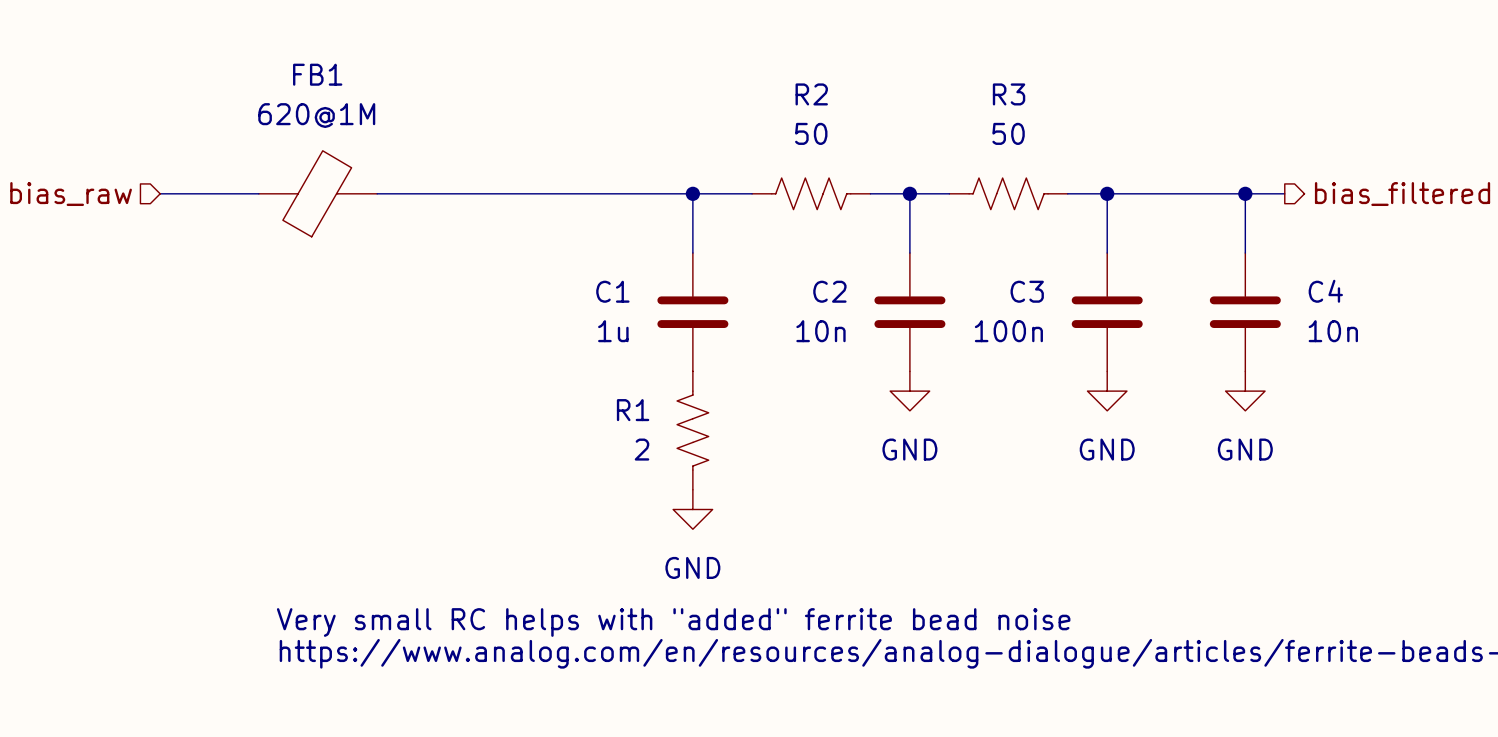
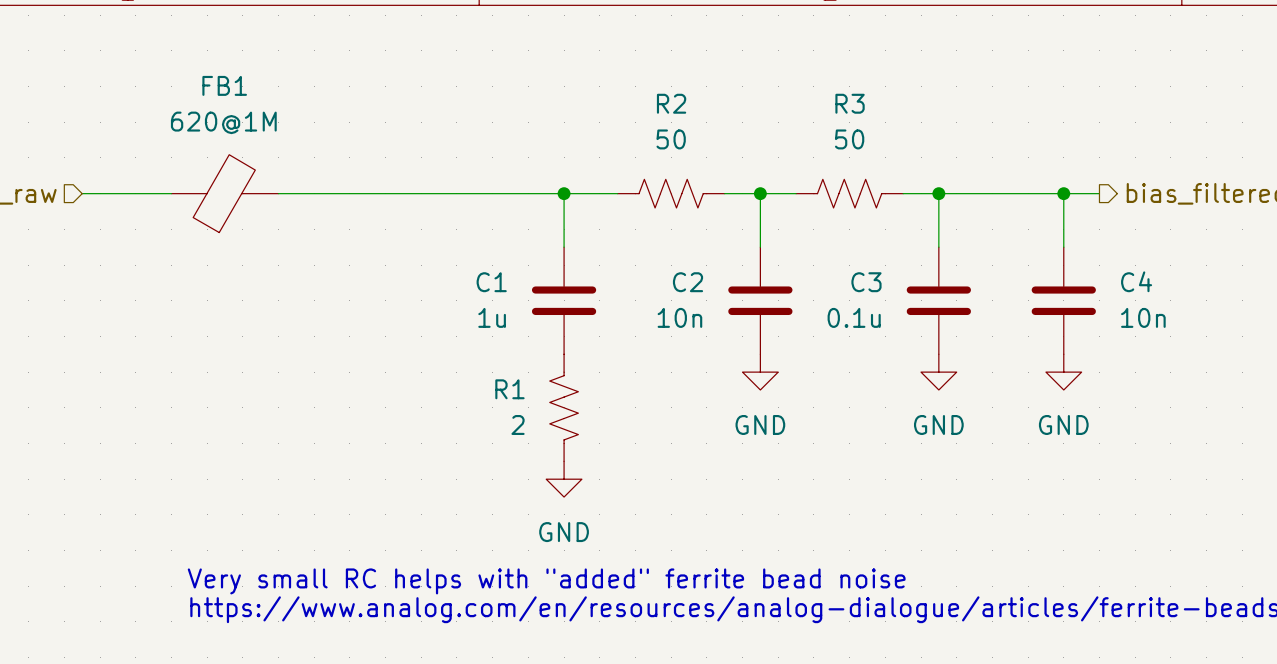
C3 value: 100n (1008, 331) -> 0.1u (854, 317)

